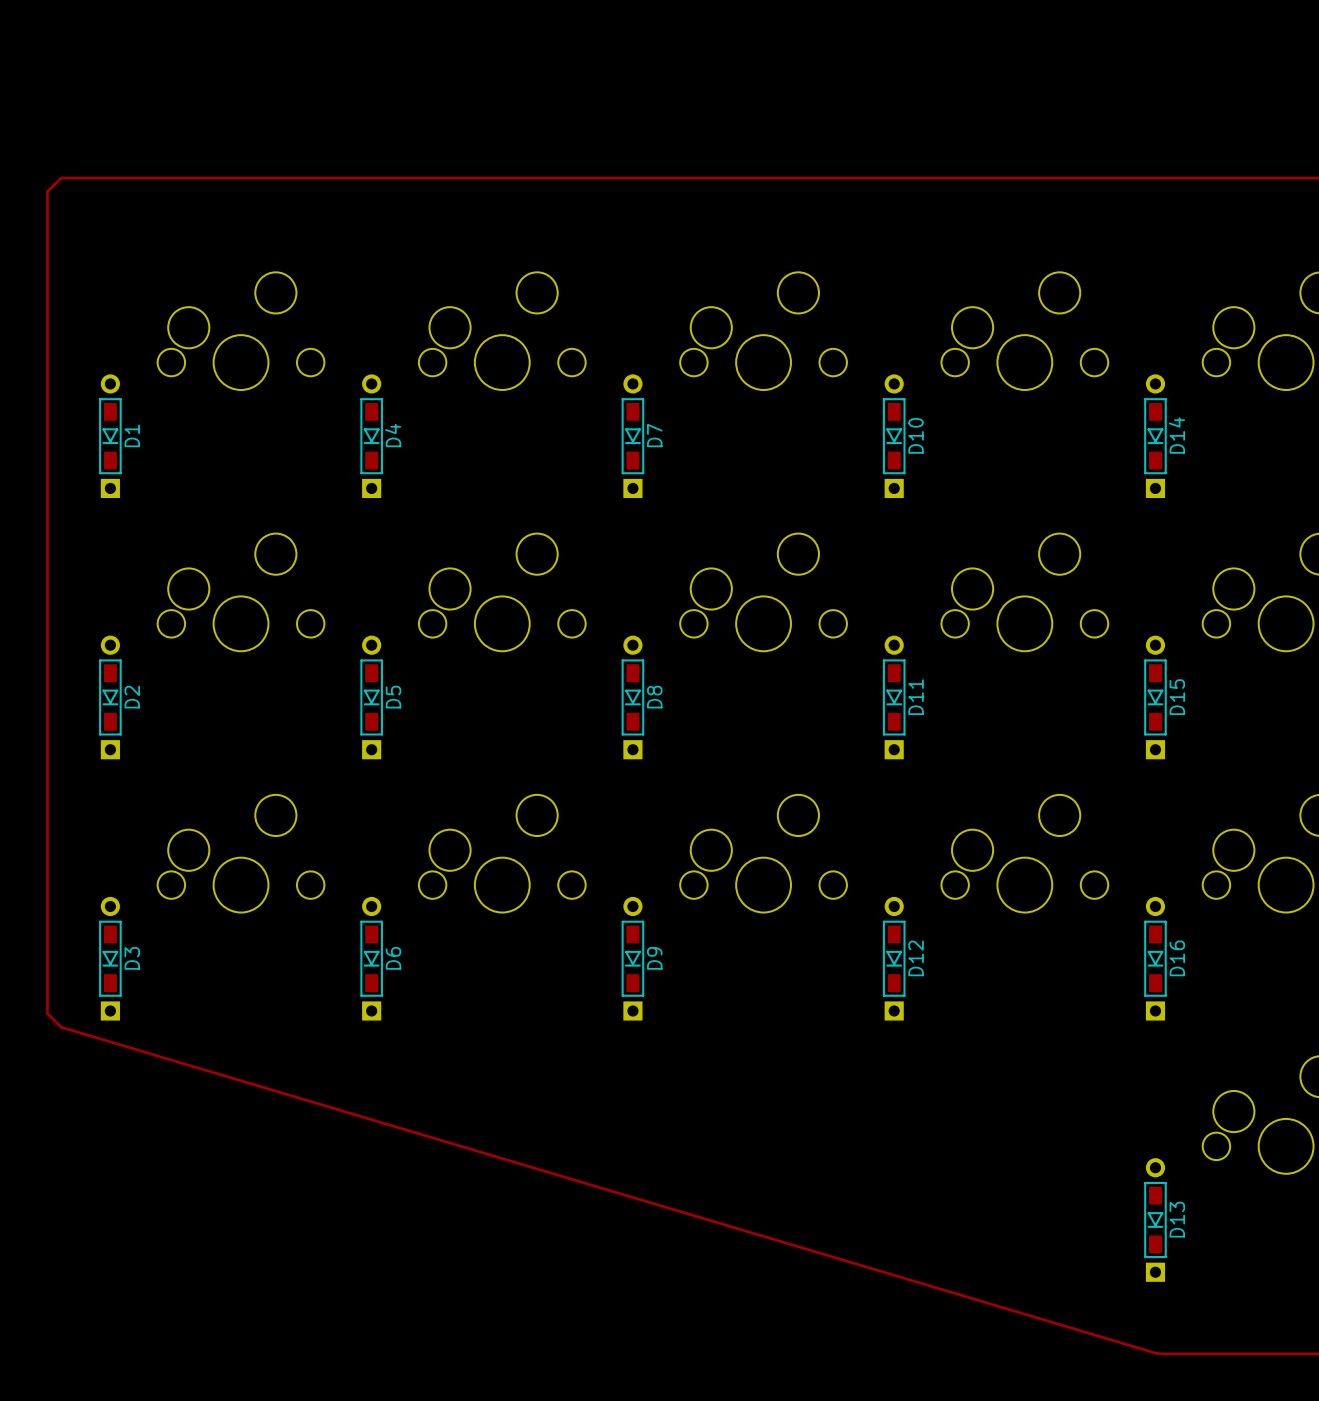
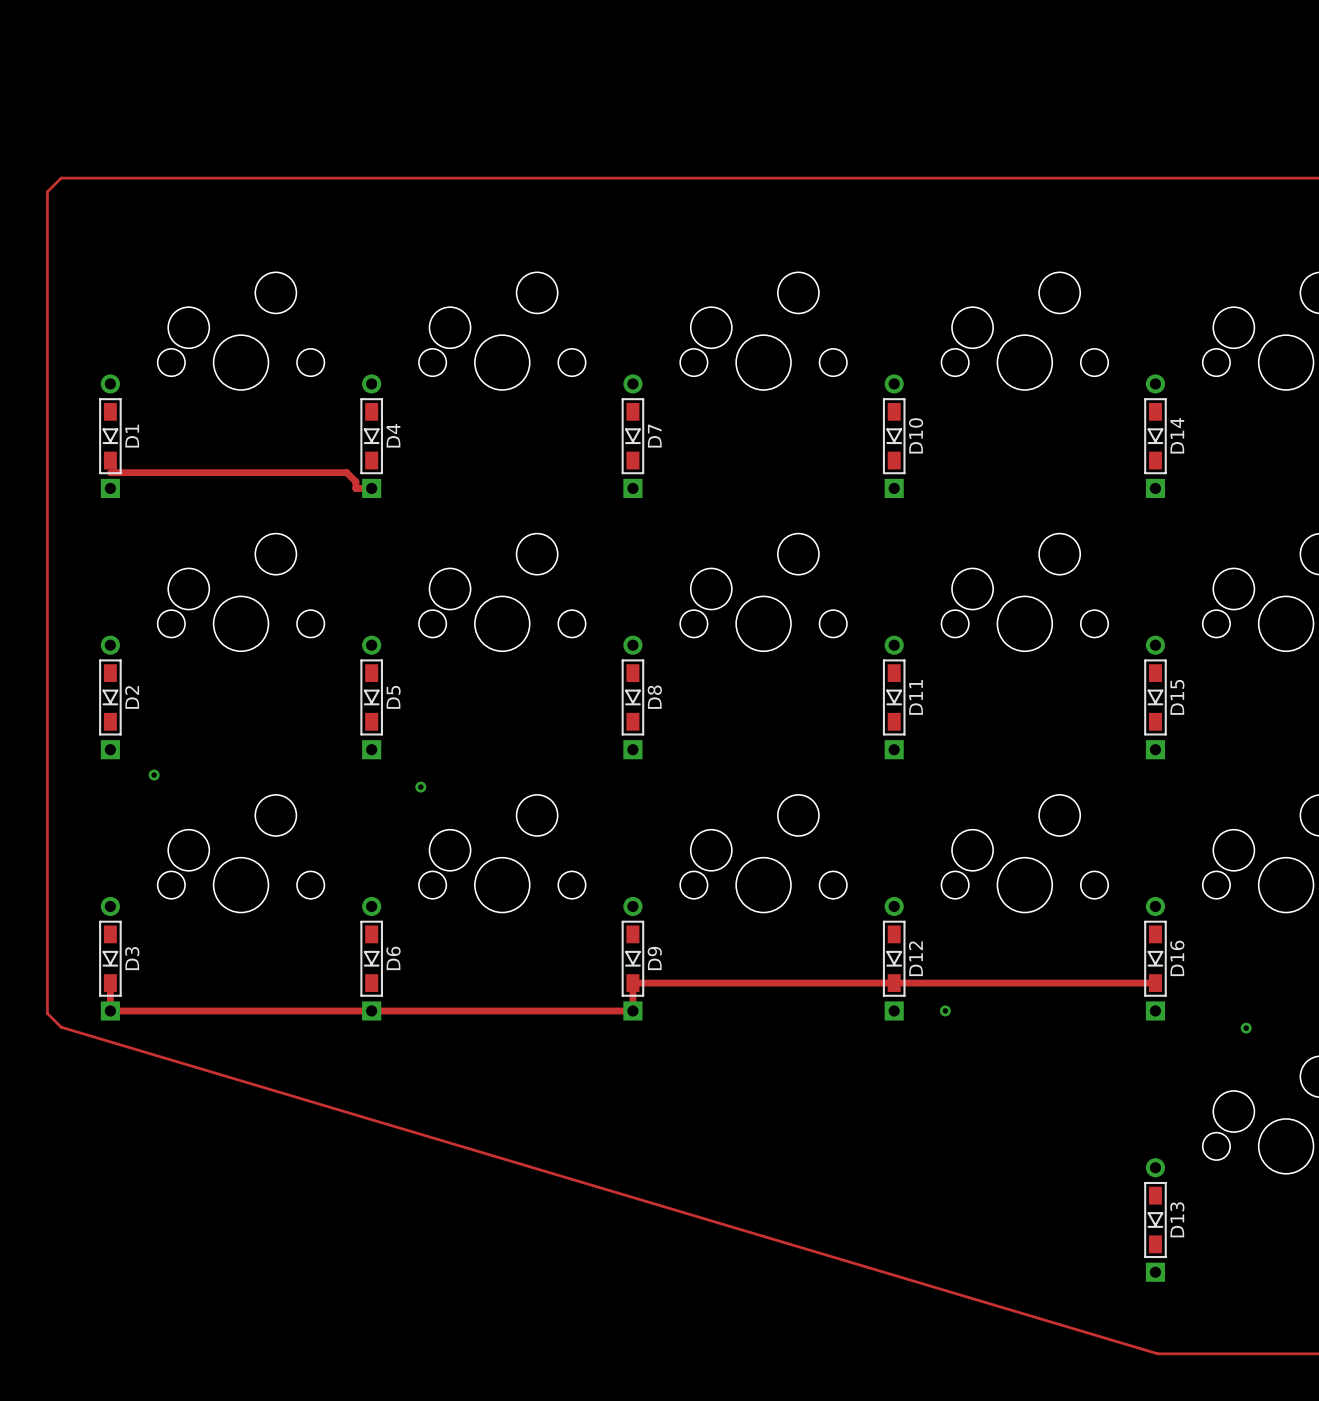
track: none -> (110, 472) (346, 472) (355, 481) (355, 488) (371, 488)
via: none -> (154, 775)
via: none -> (420, 787)
track: none -> (110, 983) (110, 1010) (632, 1010) (632, 983) (1155, 983)
via: none -> (945, 1010)
via: none -> (1246, 1028)

